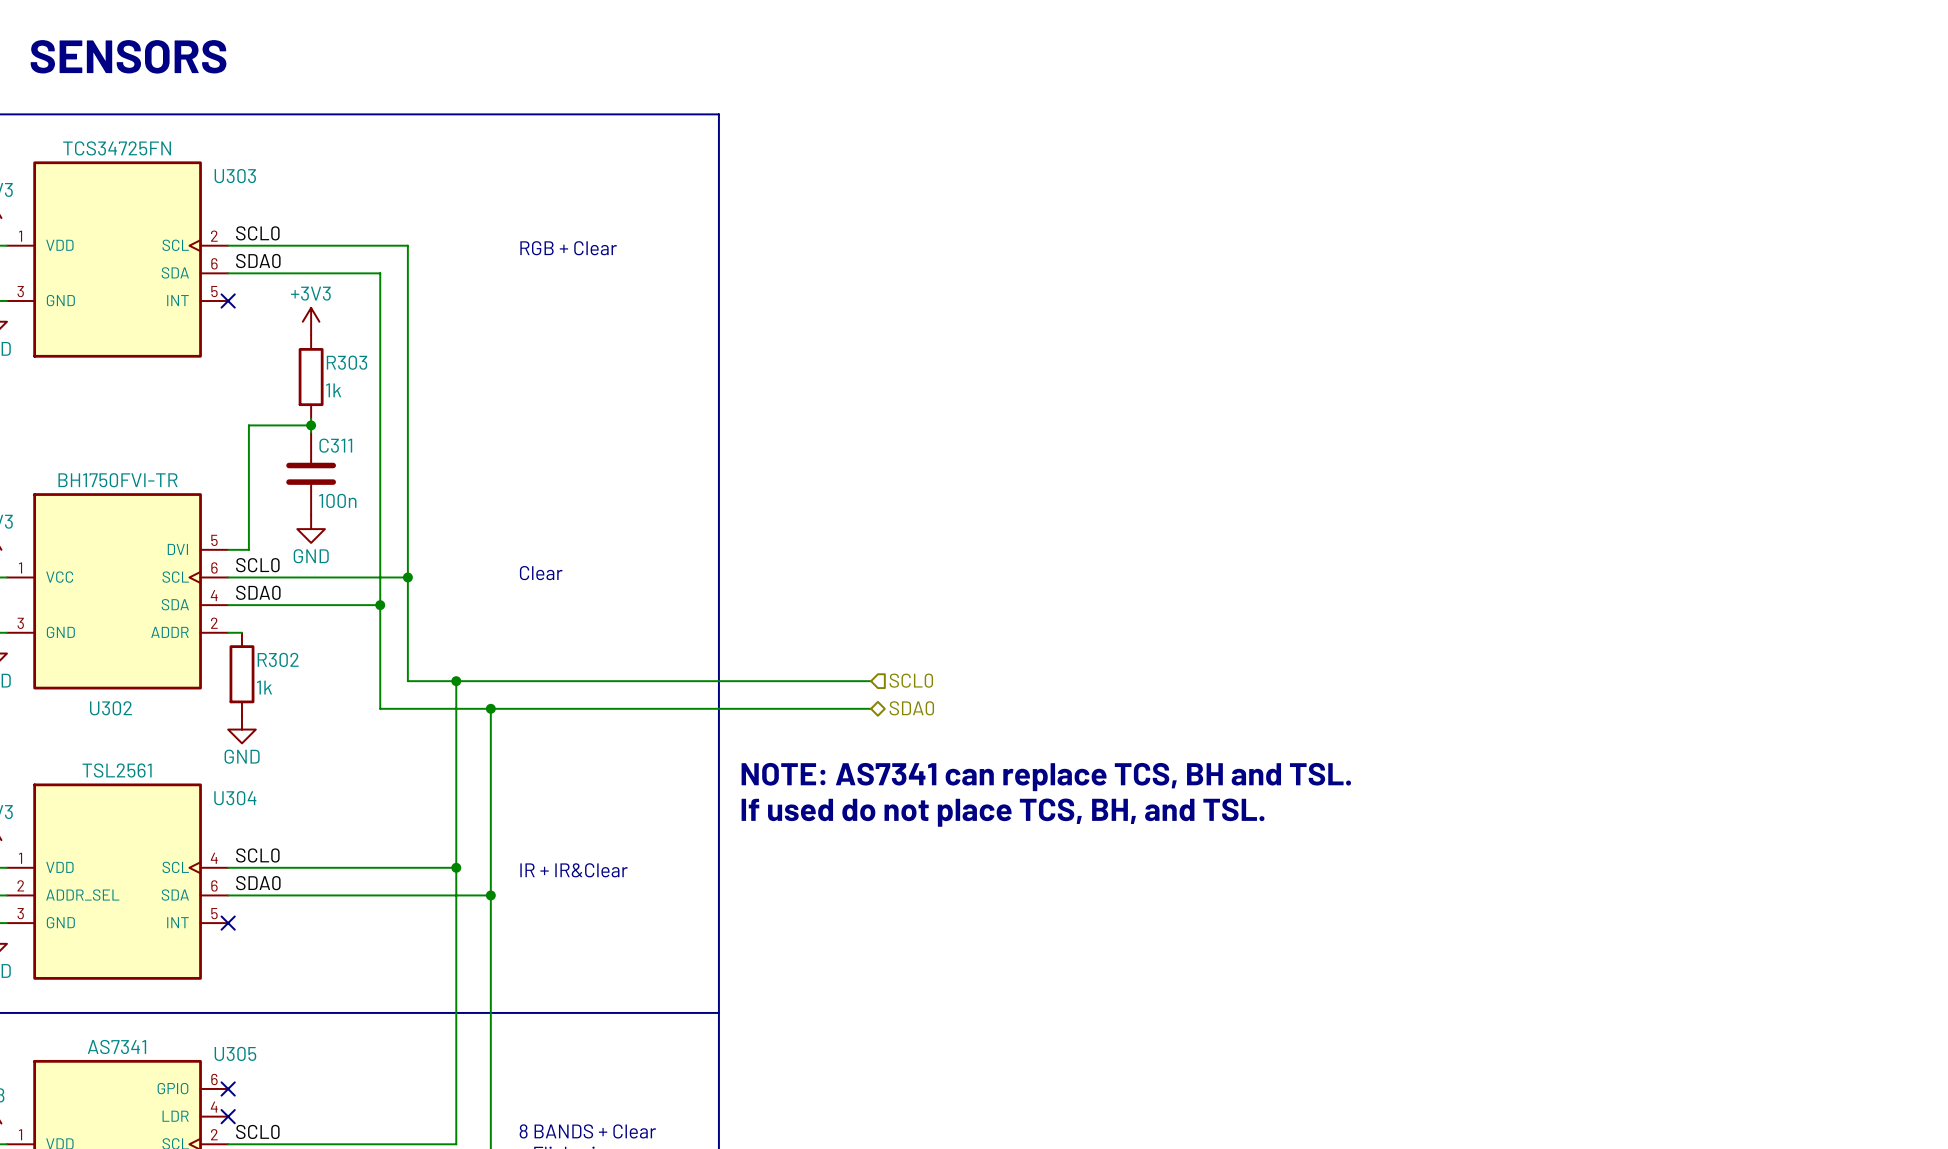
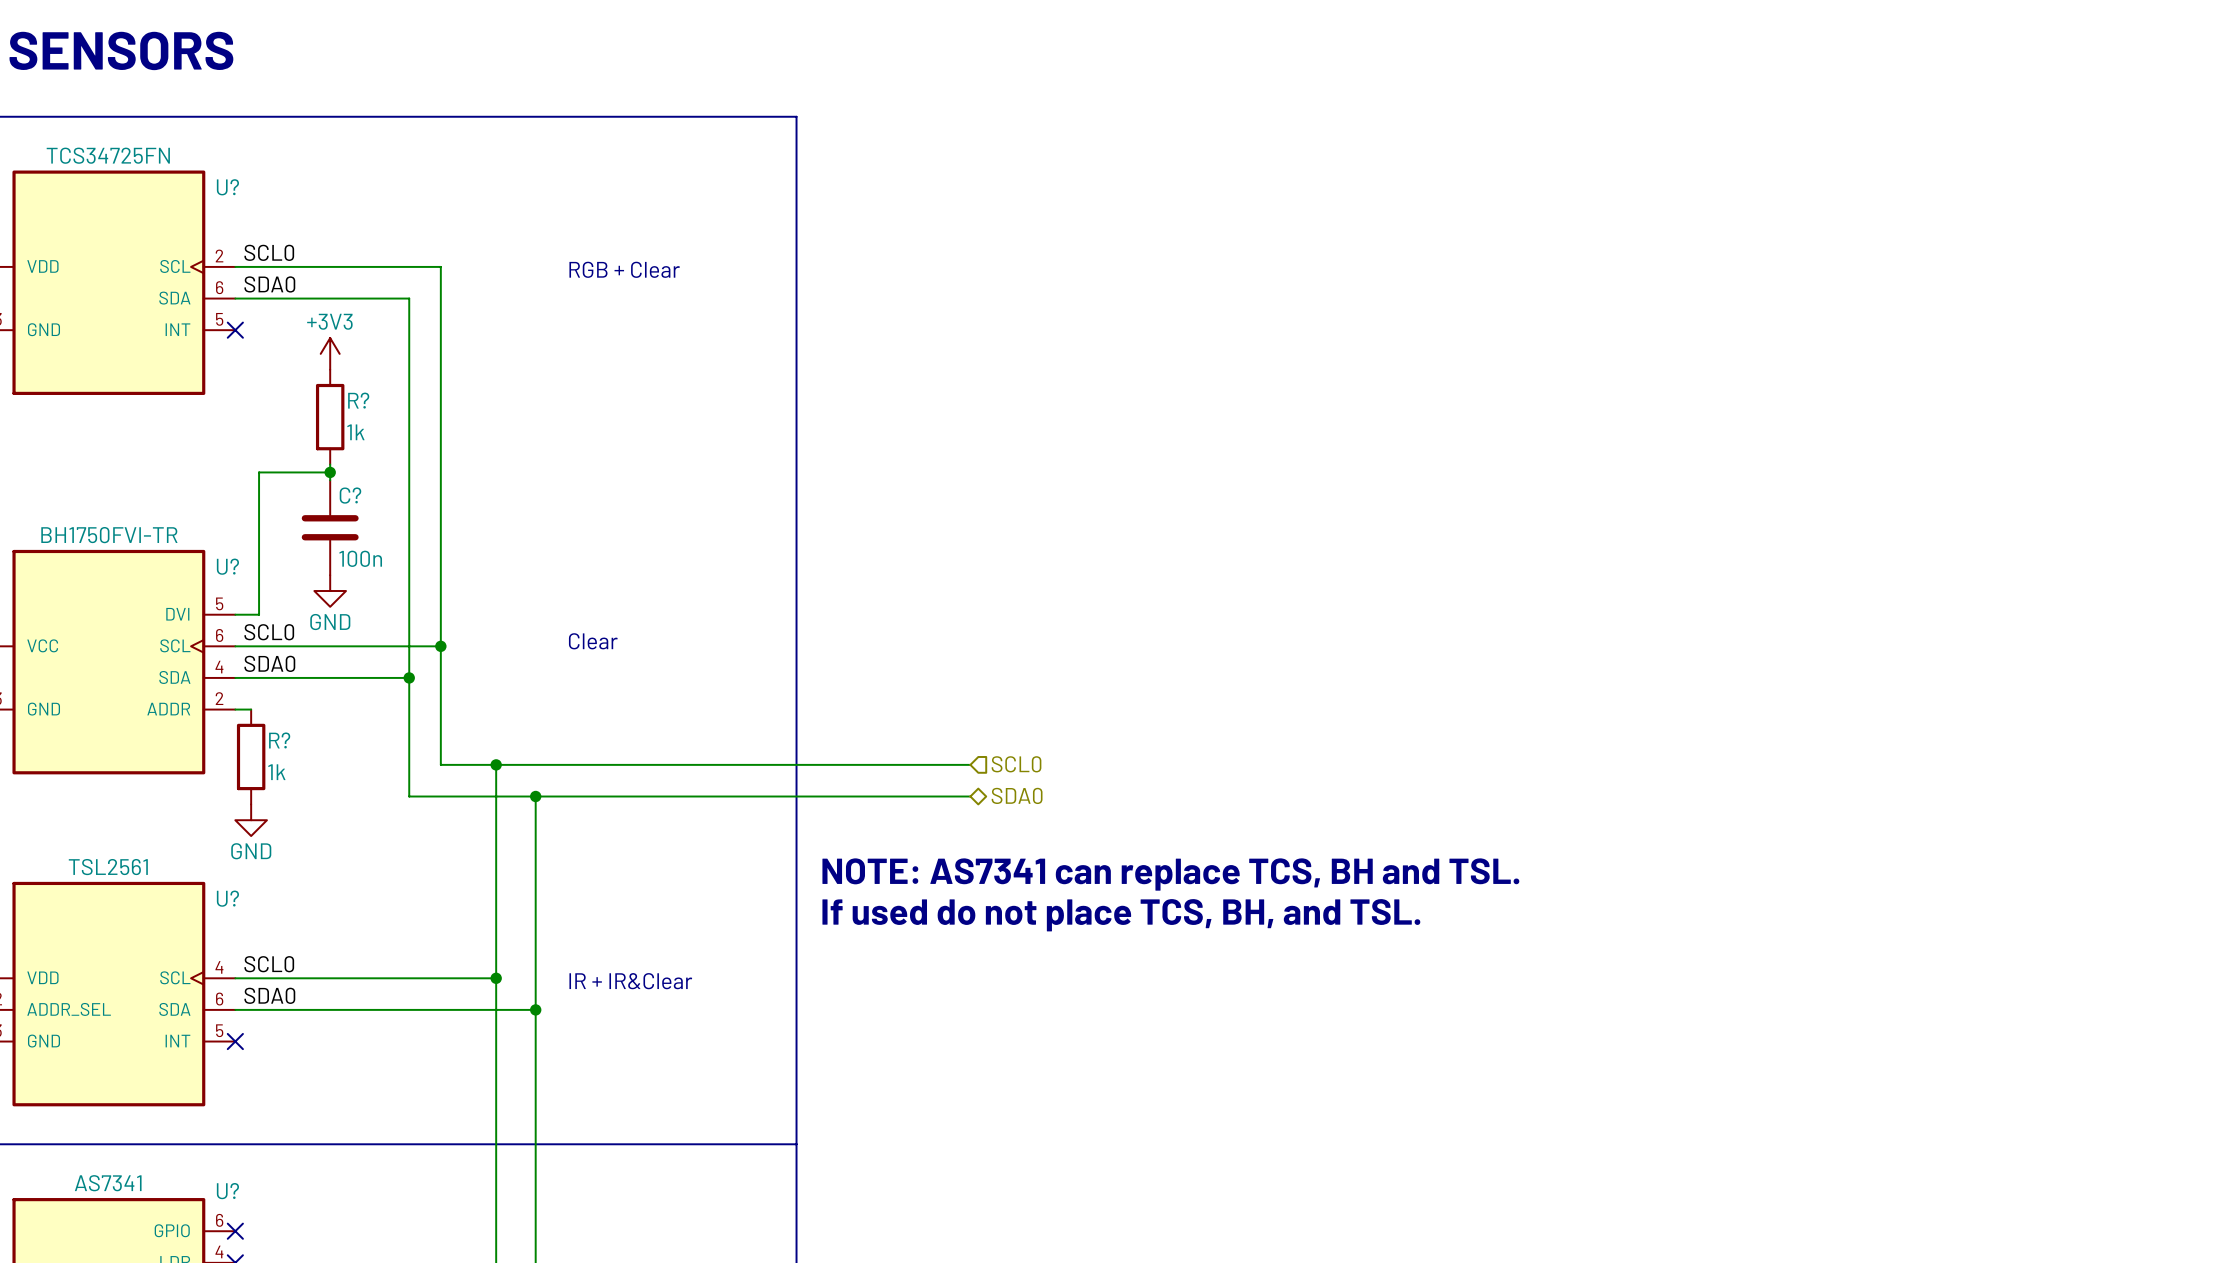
U303 name: U303 (235, 176) -> U? (227, 187)
R303 name: R303 (347, 362) -> R? (358, 400)
C311 name: C311 (335, 445) -> C? (350, 495)
R302 name: R302 (278, 659) -> R? (279, 740)
U302 name: U302 (110, 708) -> U? (227, 566)
U304 name: U304 (235, 798) -> U? (227, 898)
U305 name: U305 (235, 1053) -> U? (227, 1191)

